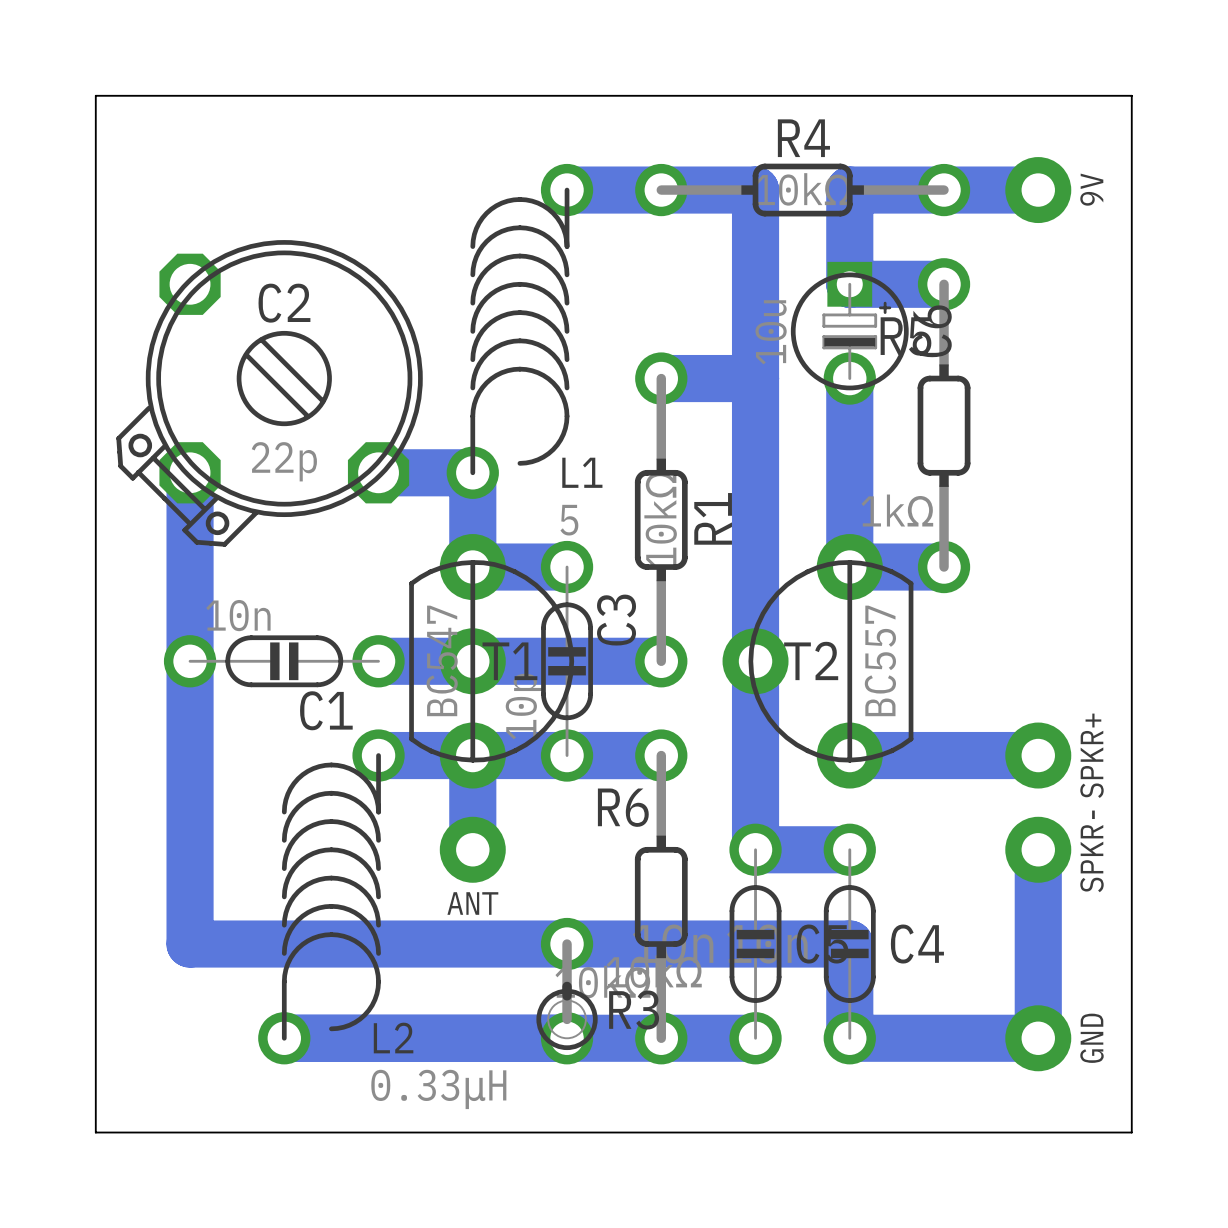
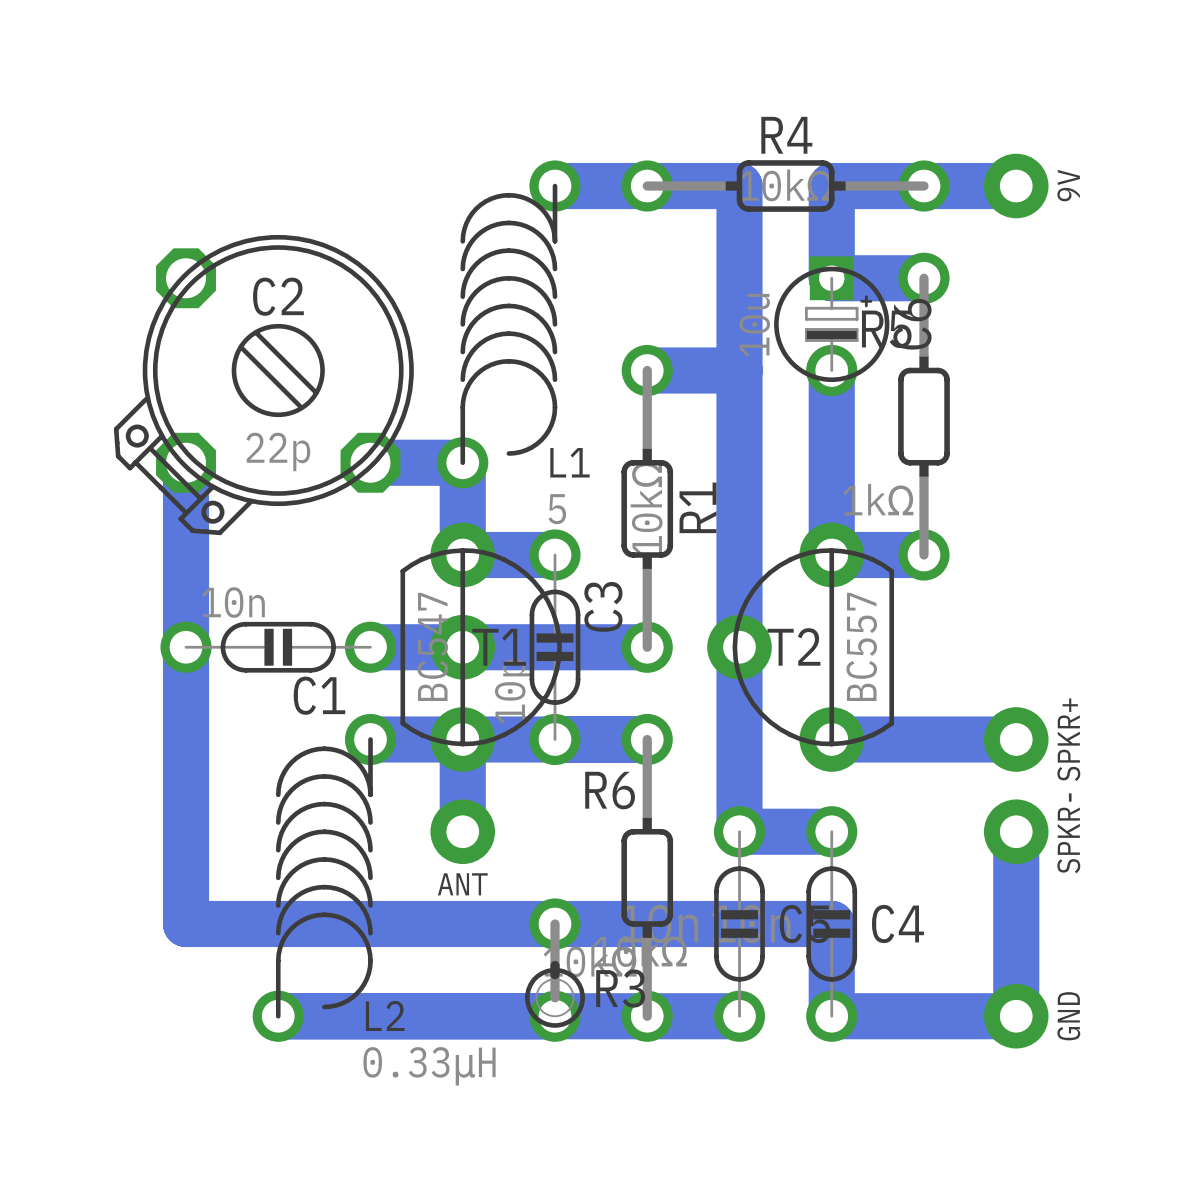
board edge: (95, 95) (1131, 95) (1131, 1132) (95, 1132) (95, 95) -> none

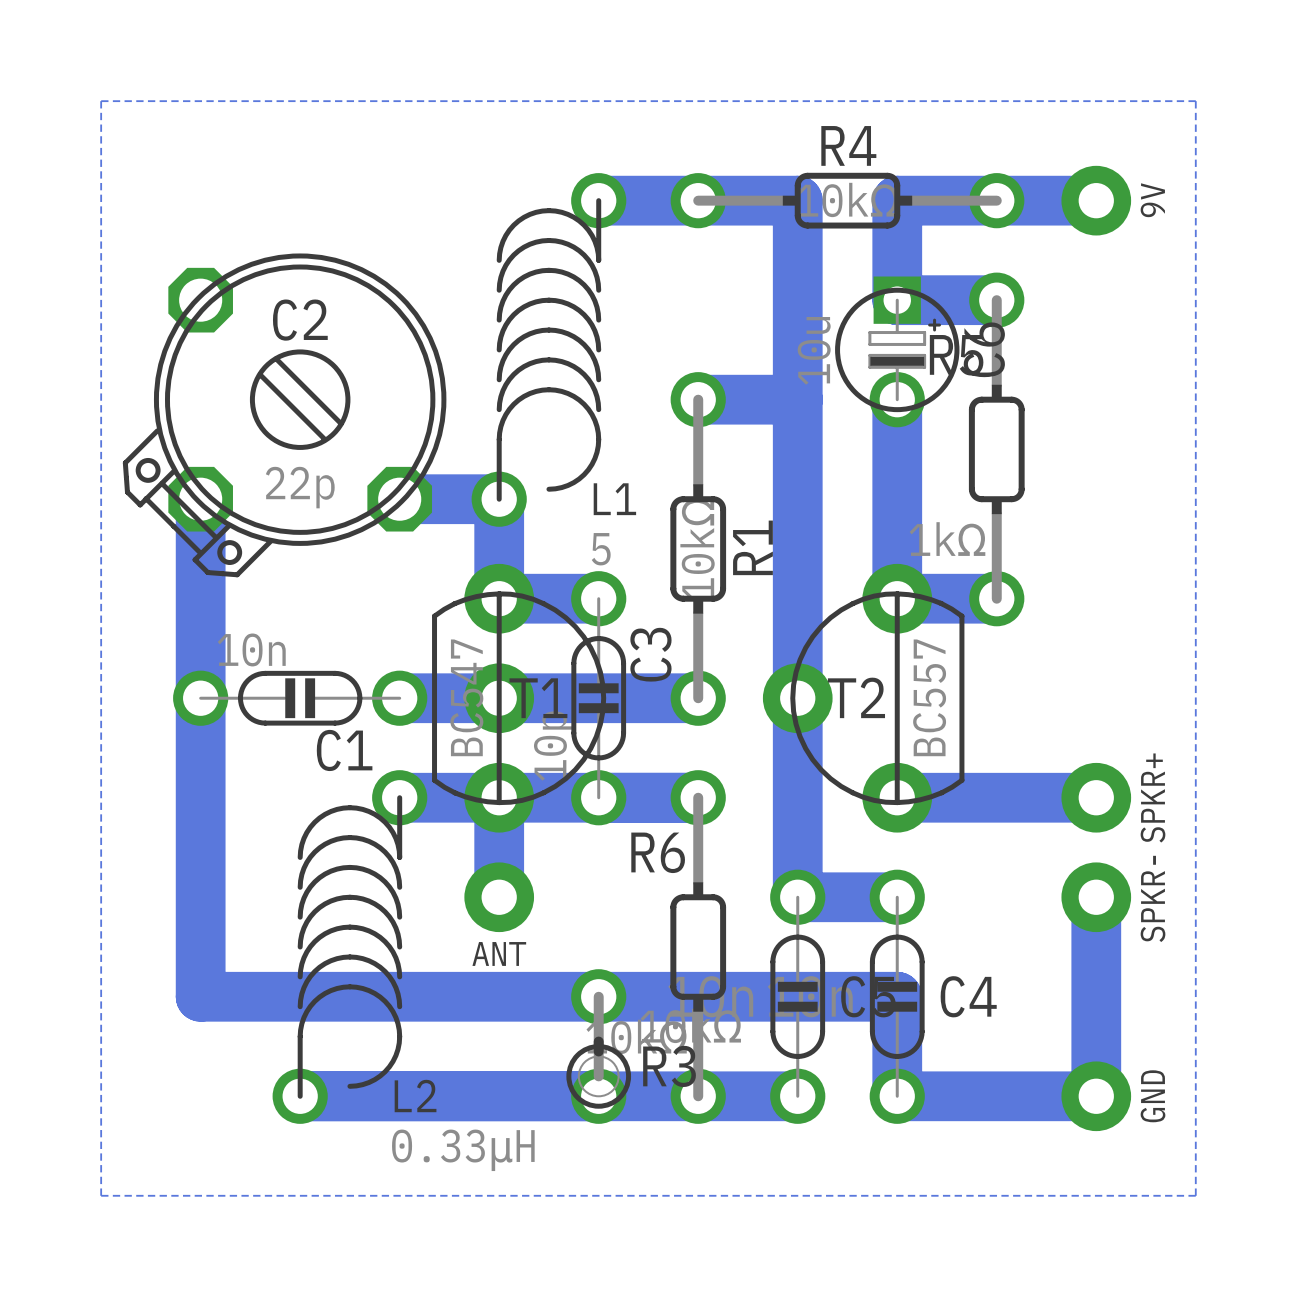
bottom zone outline: none -> (101, 101) (101, 1195) (1195, 1195) (1195, 101) (101, 101)

